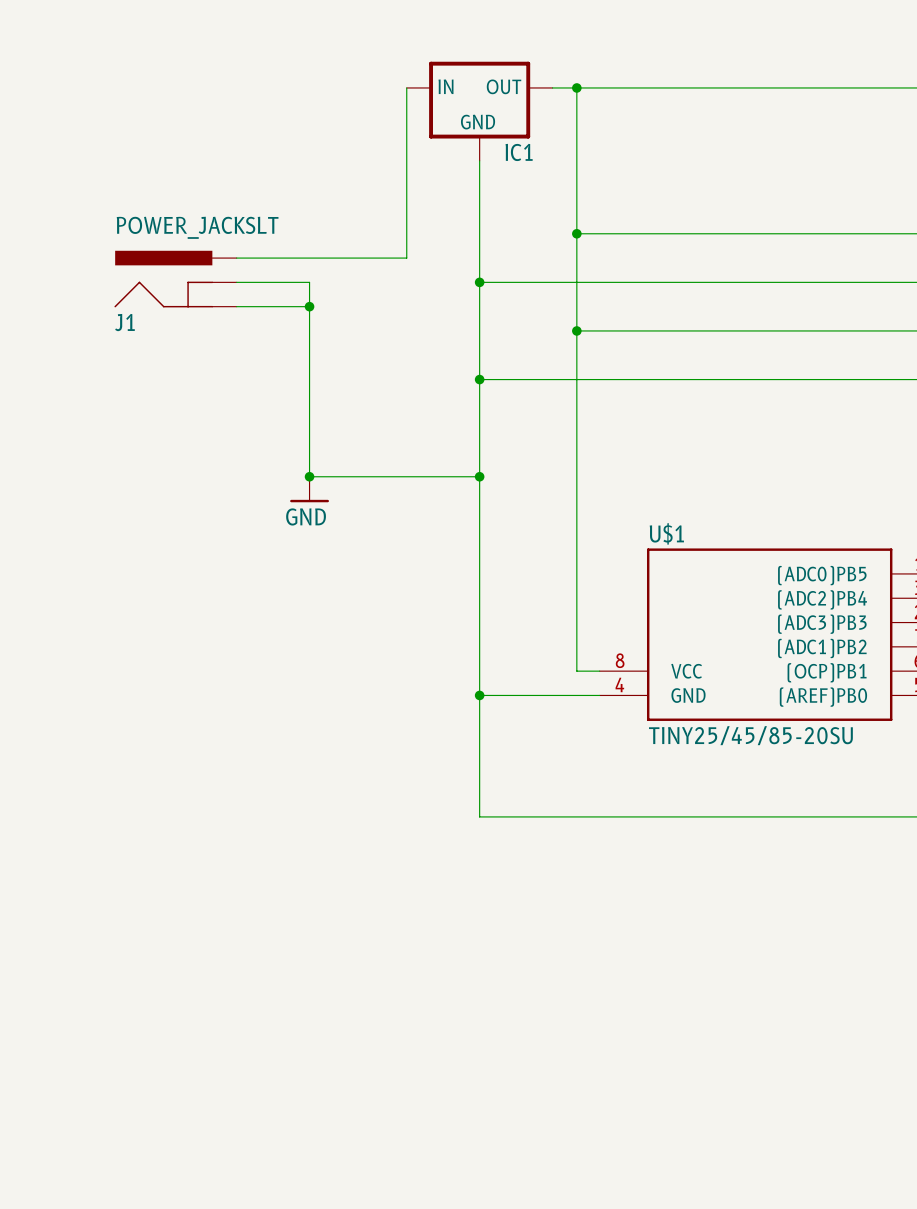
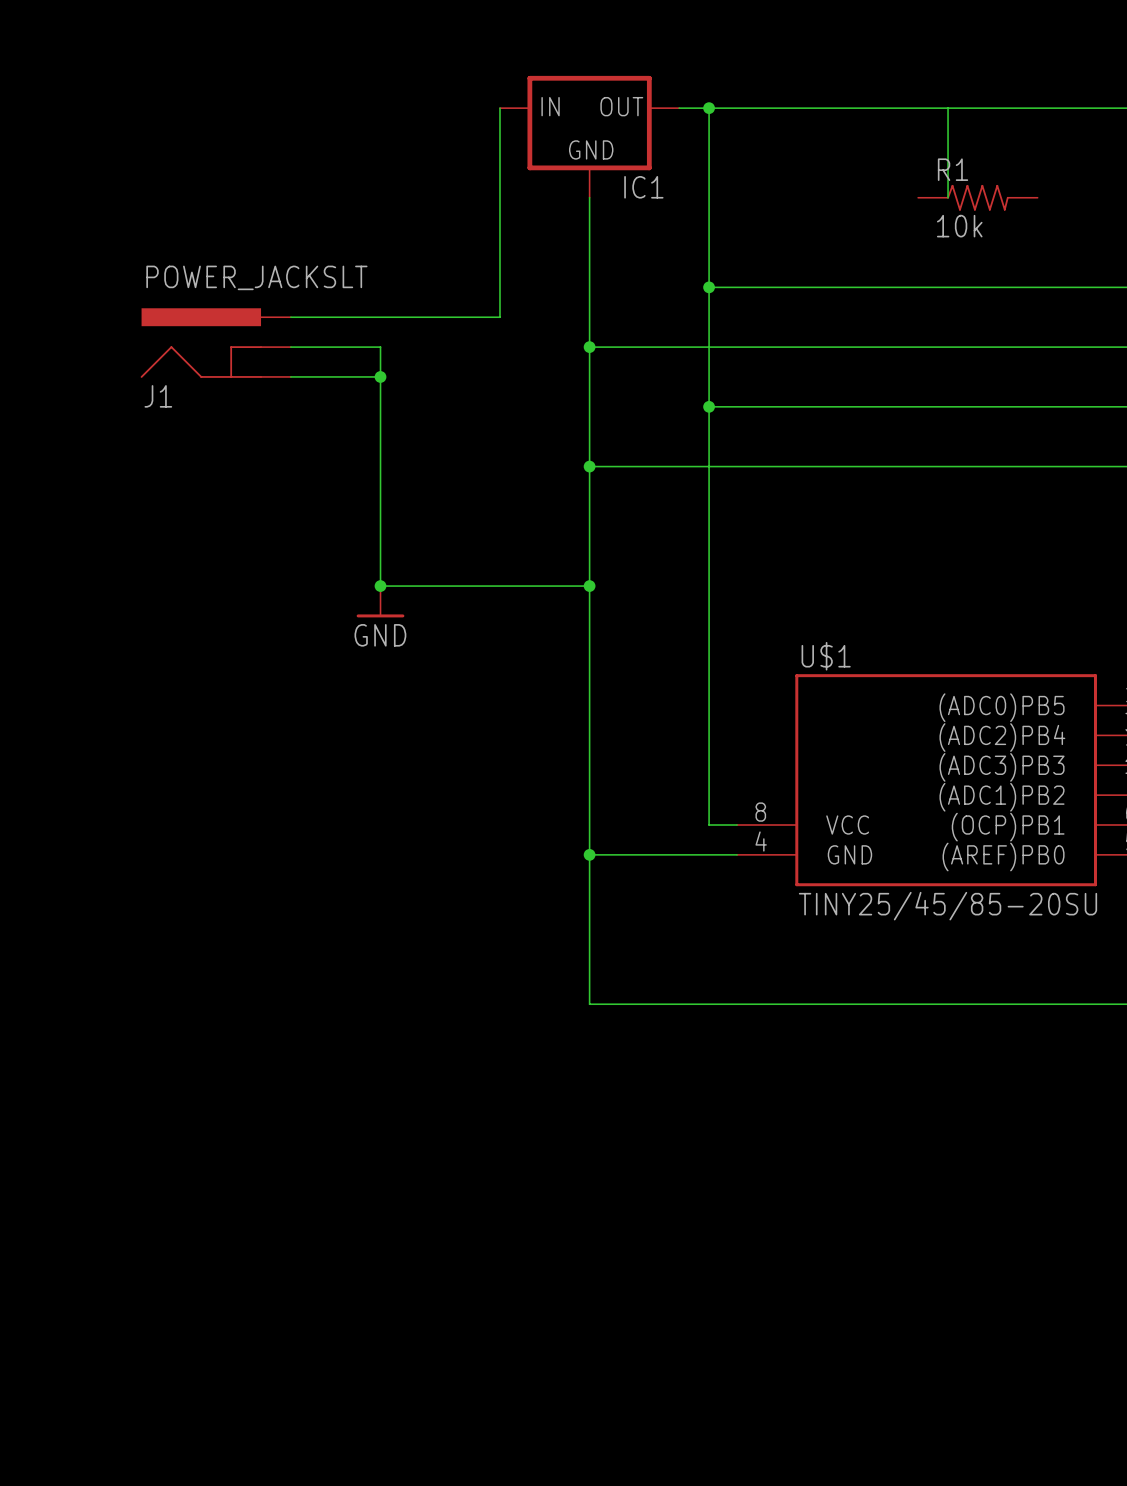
wire: none -> (948, 108) (948, 197)
R1: none -> 10k (977, 197)

